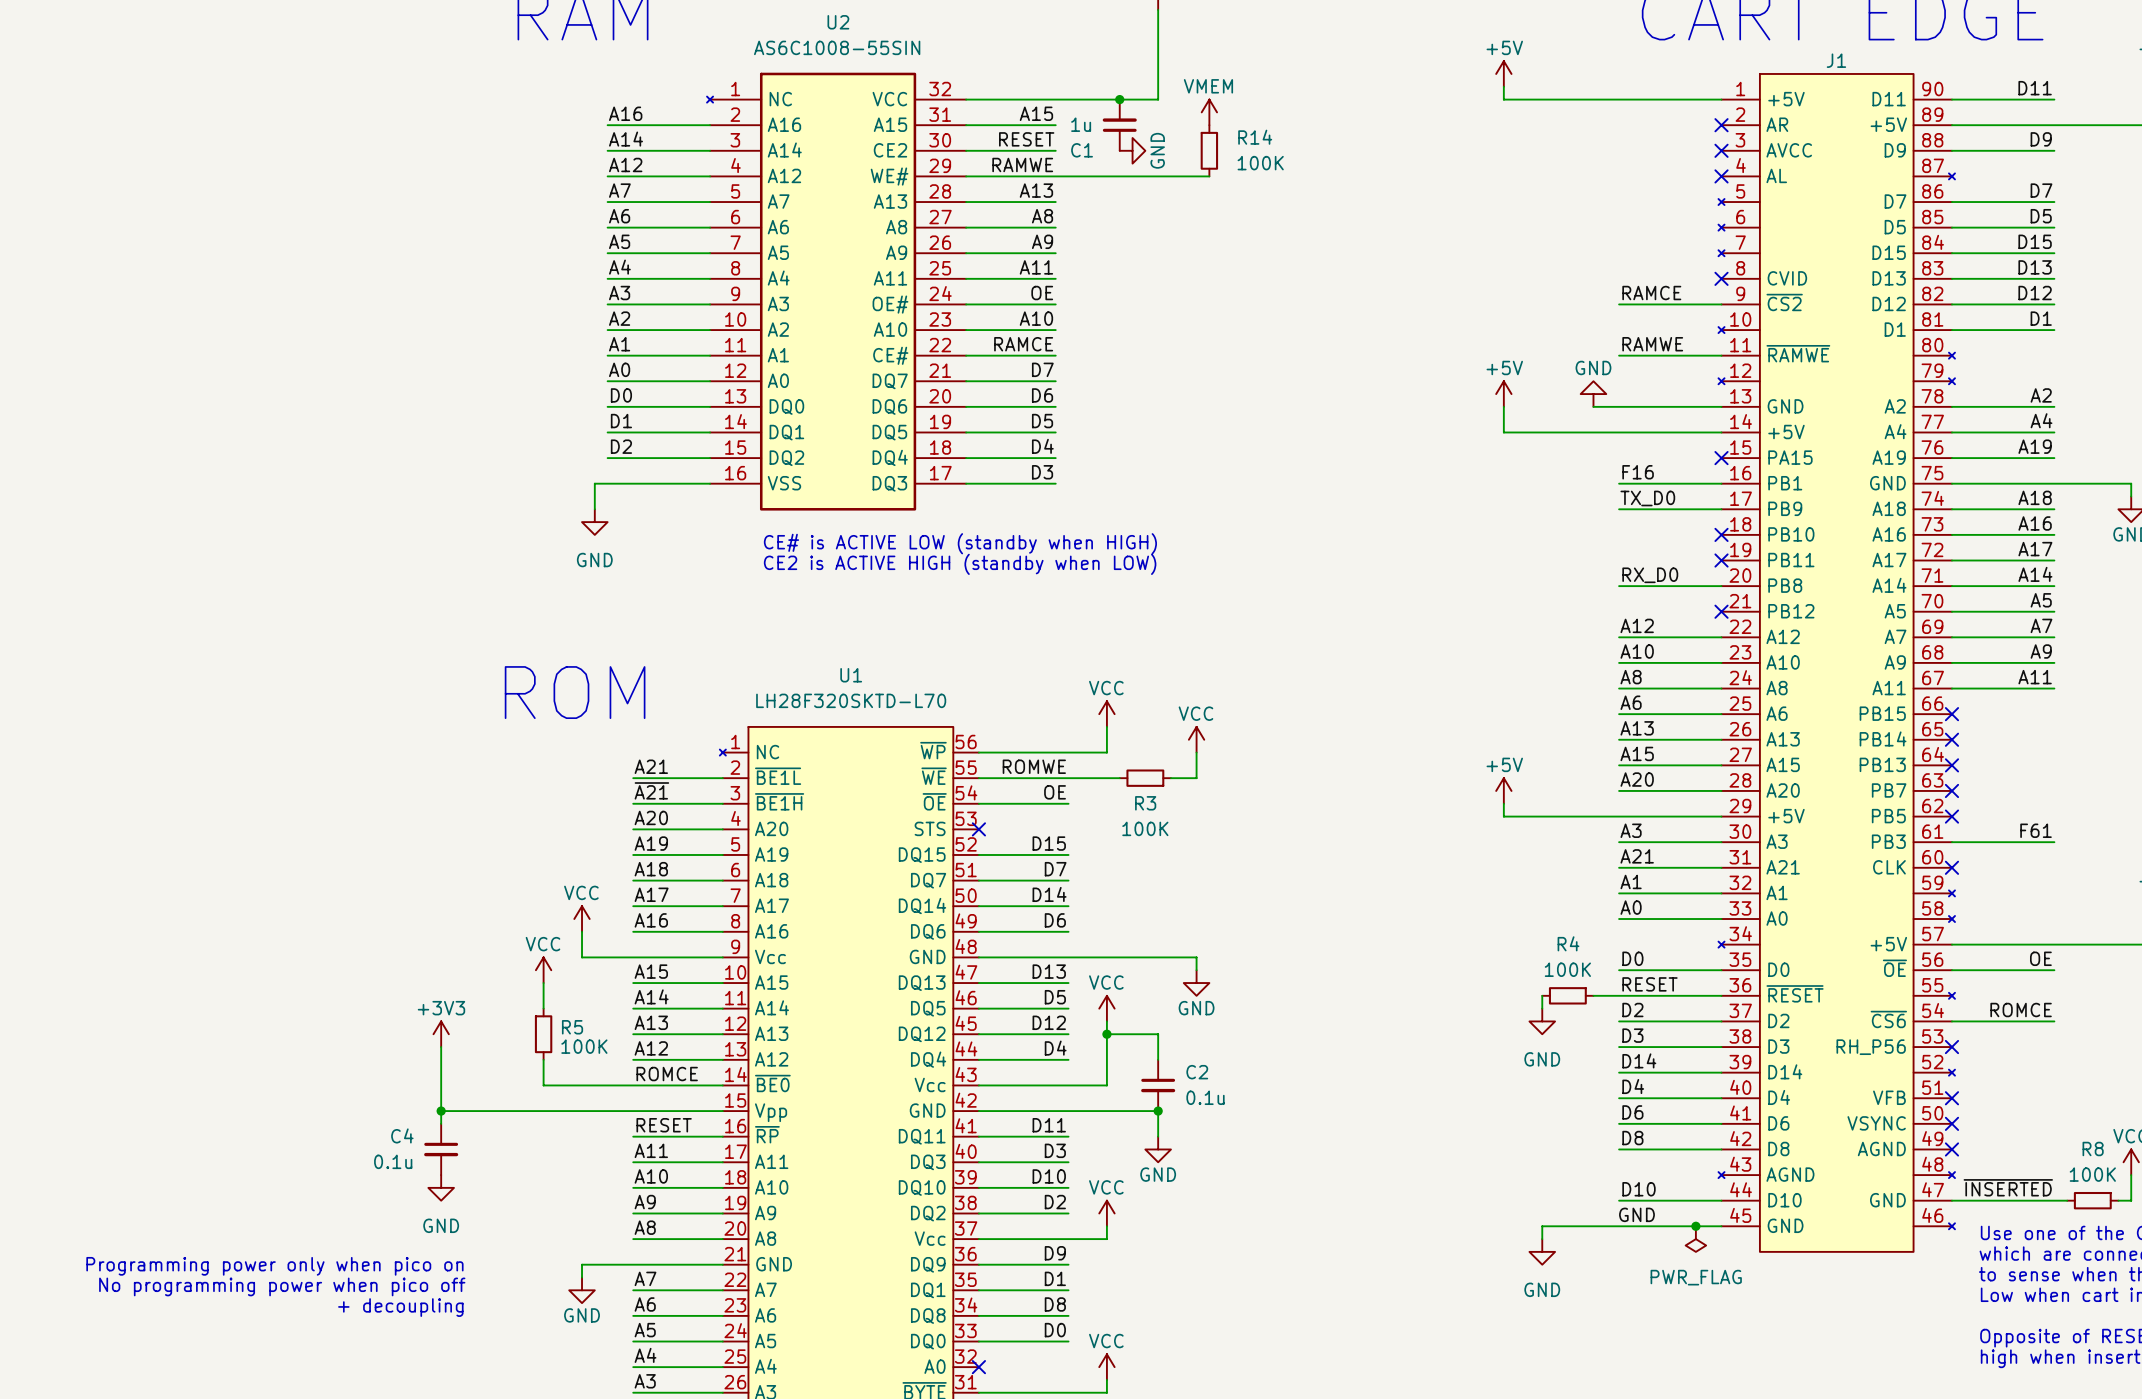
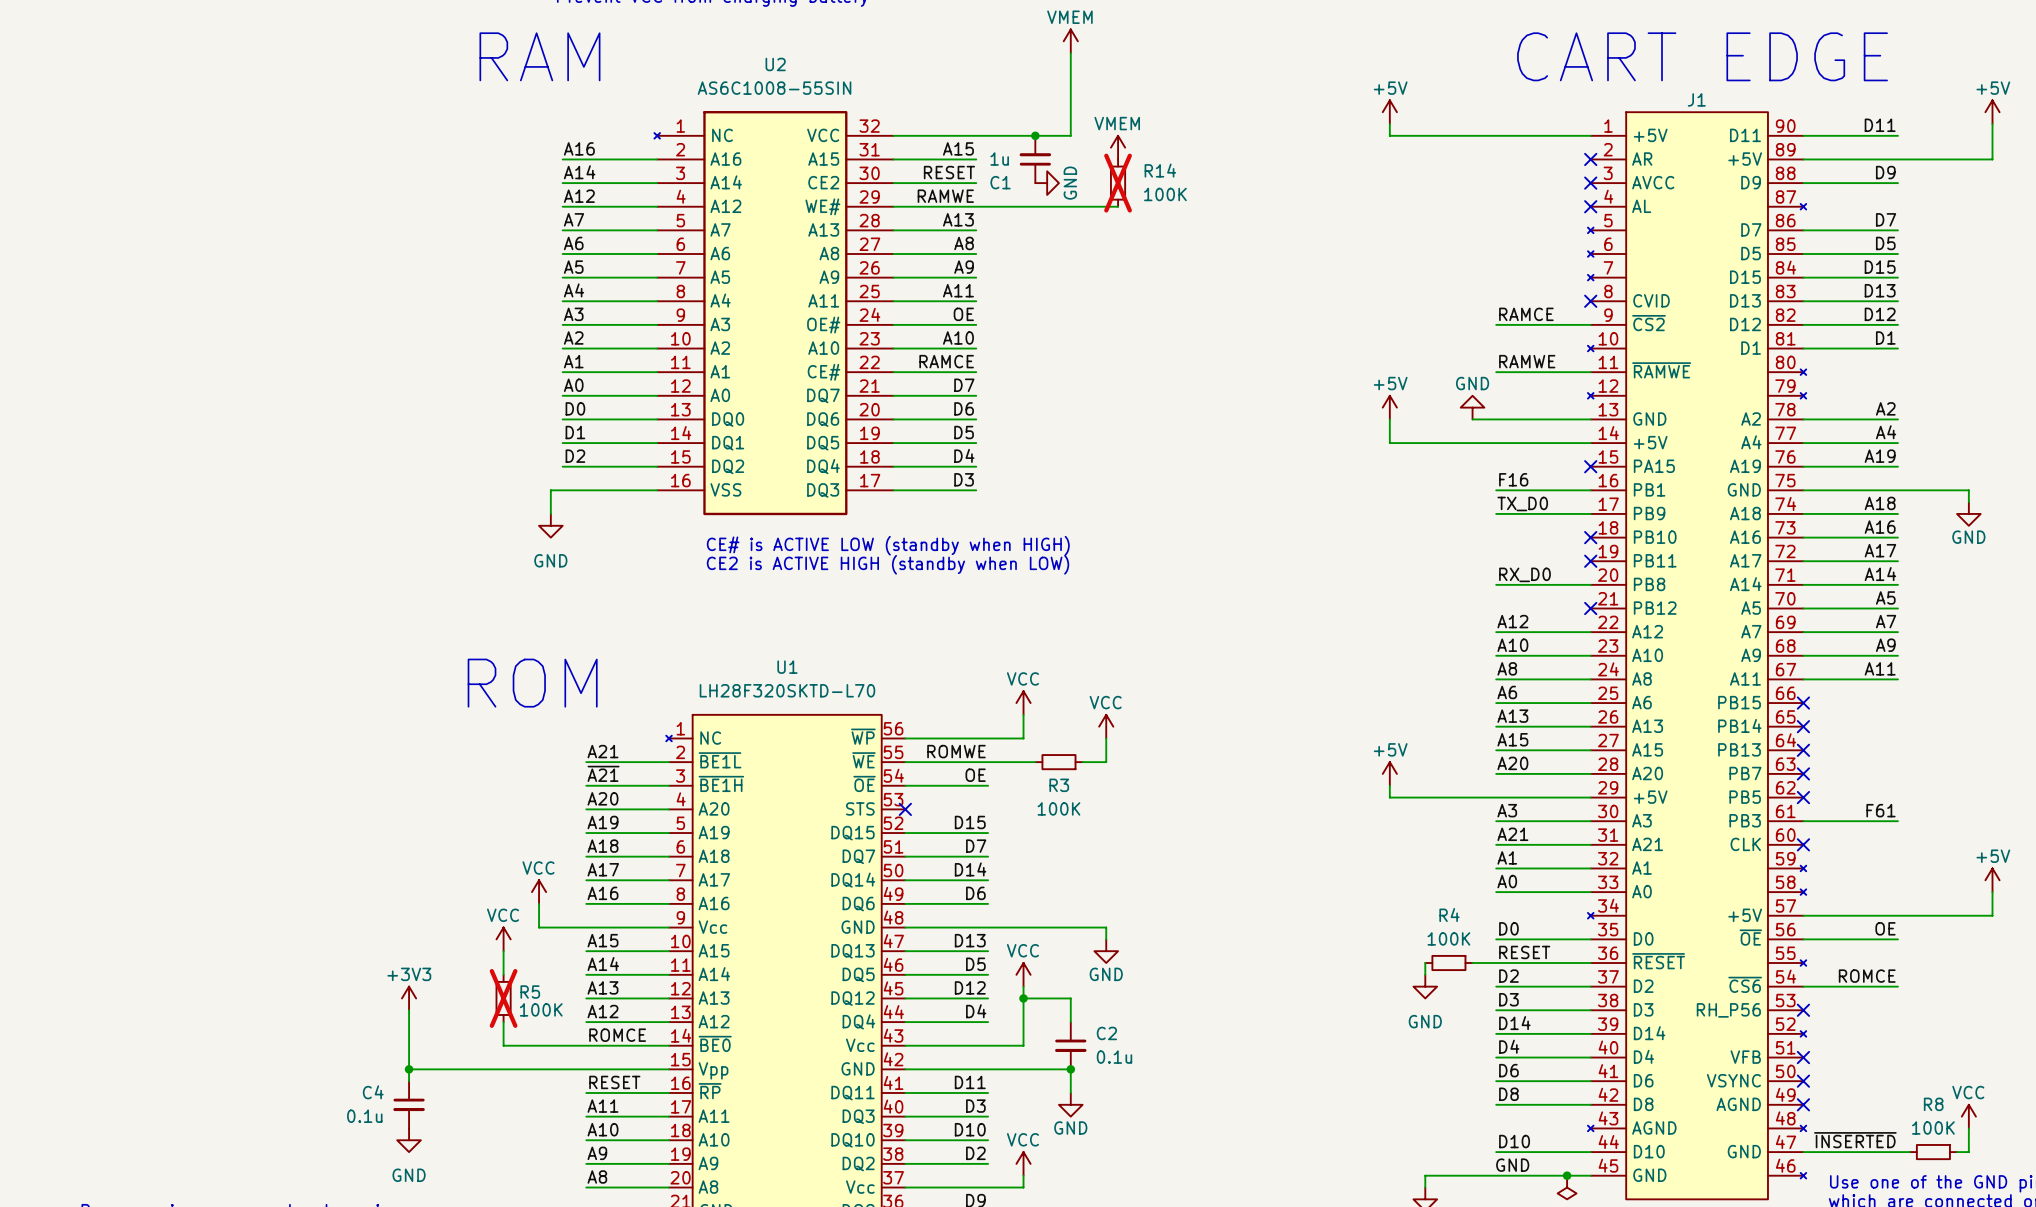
R14 do-not-place cross: none -> (1118, 183)
R5 do-not-place cross: none -> (503, 998)

